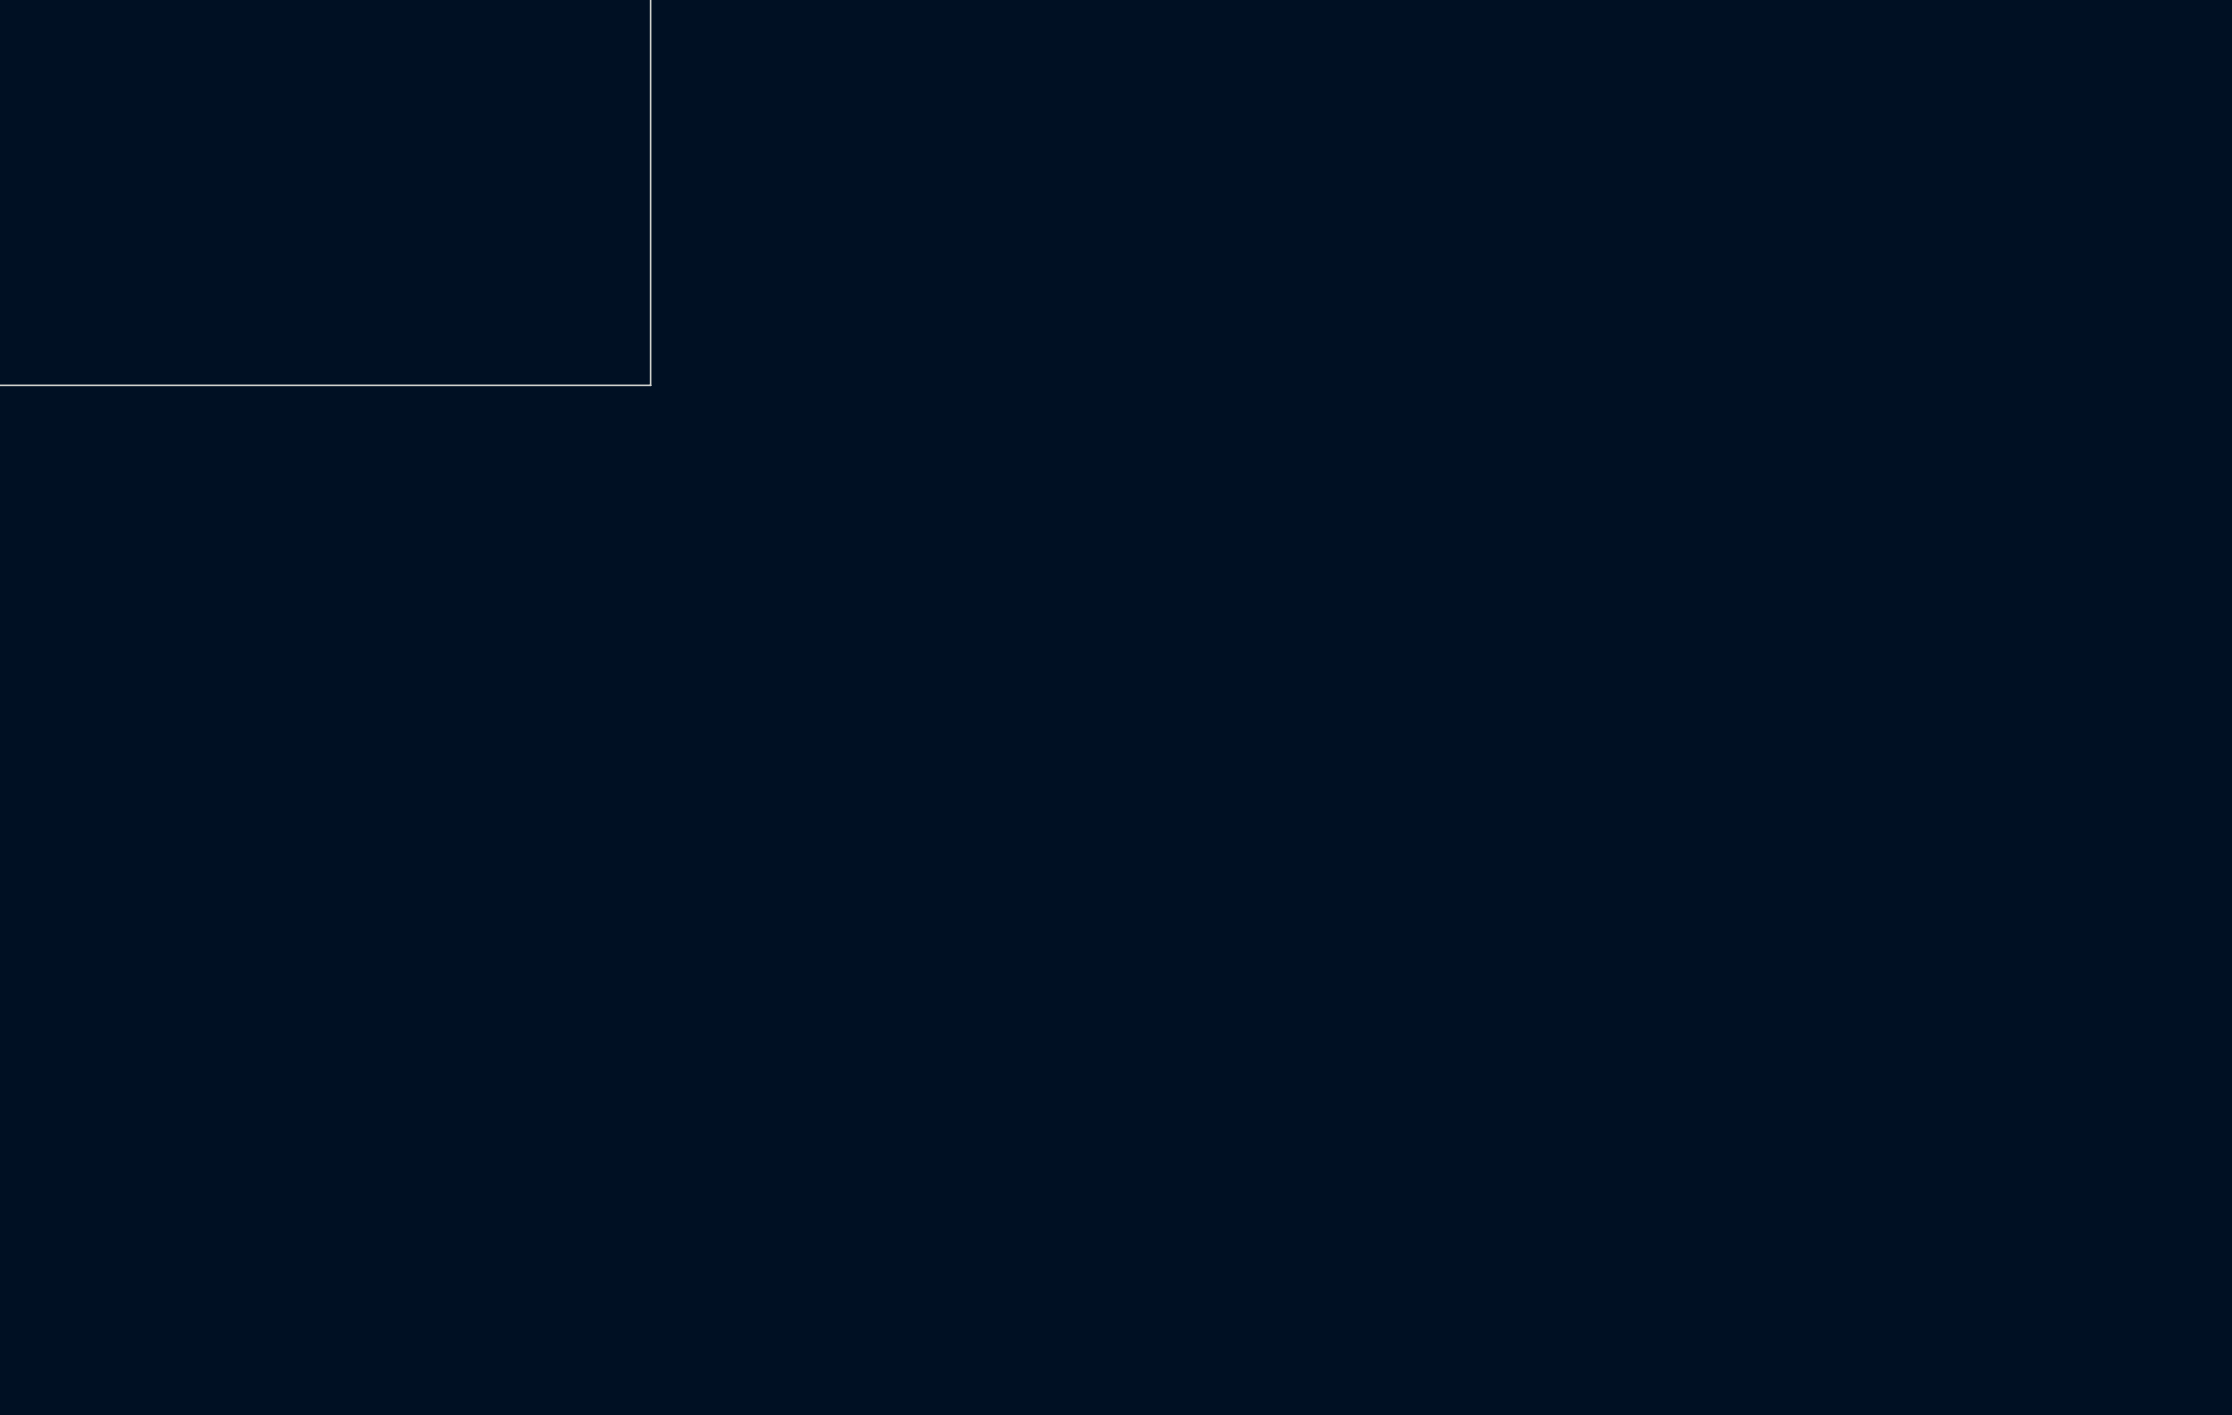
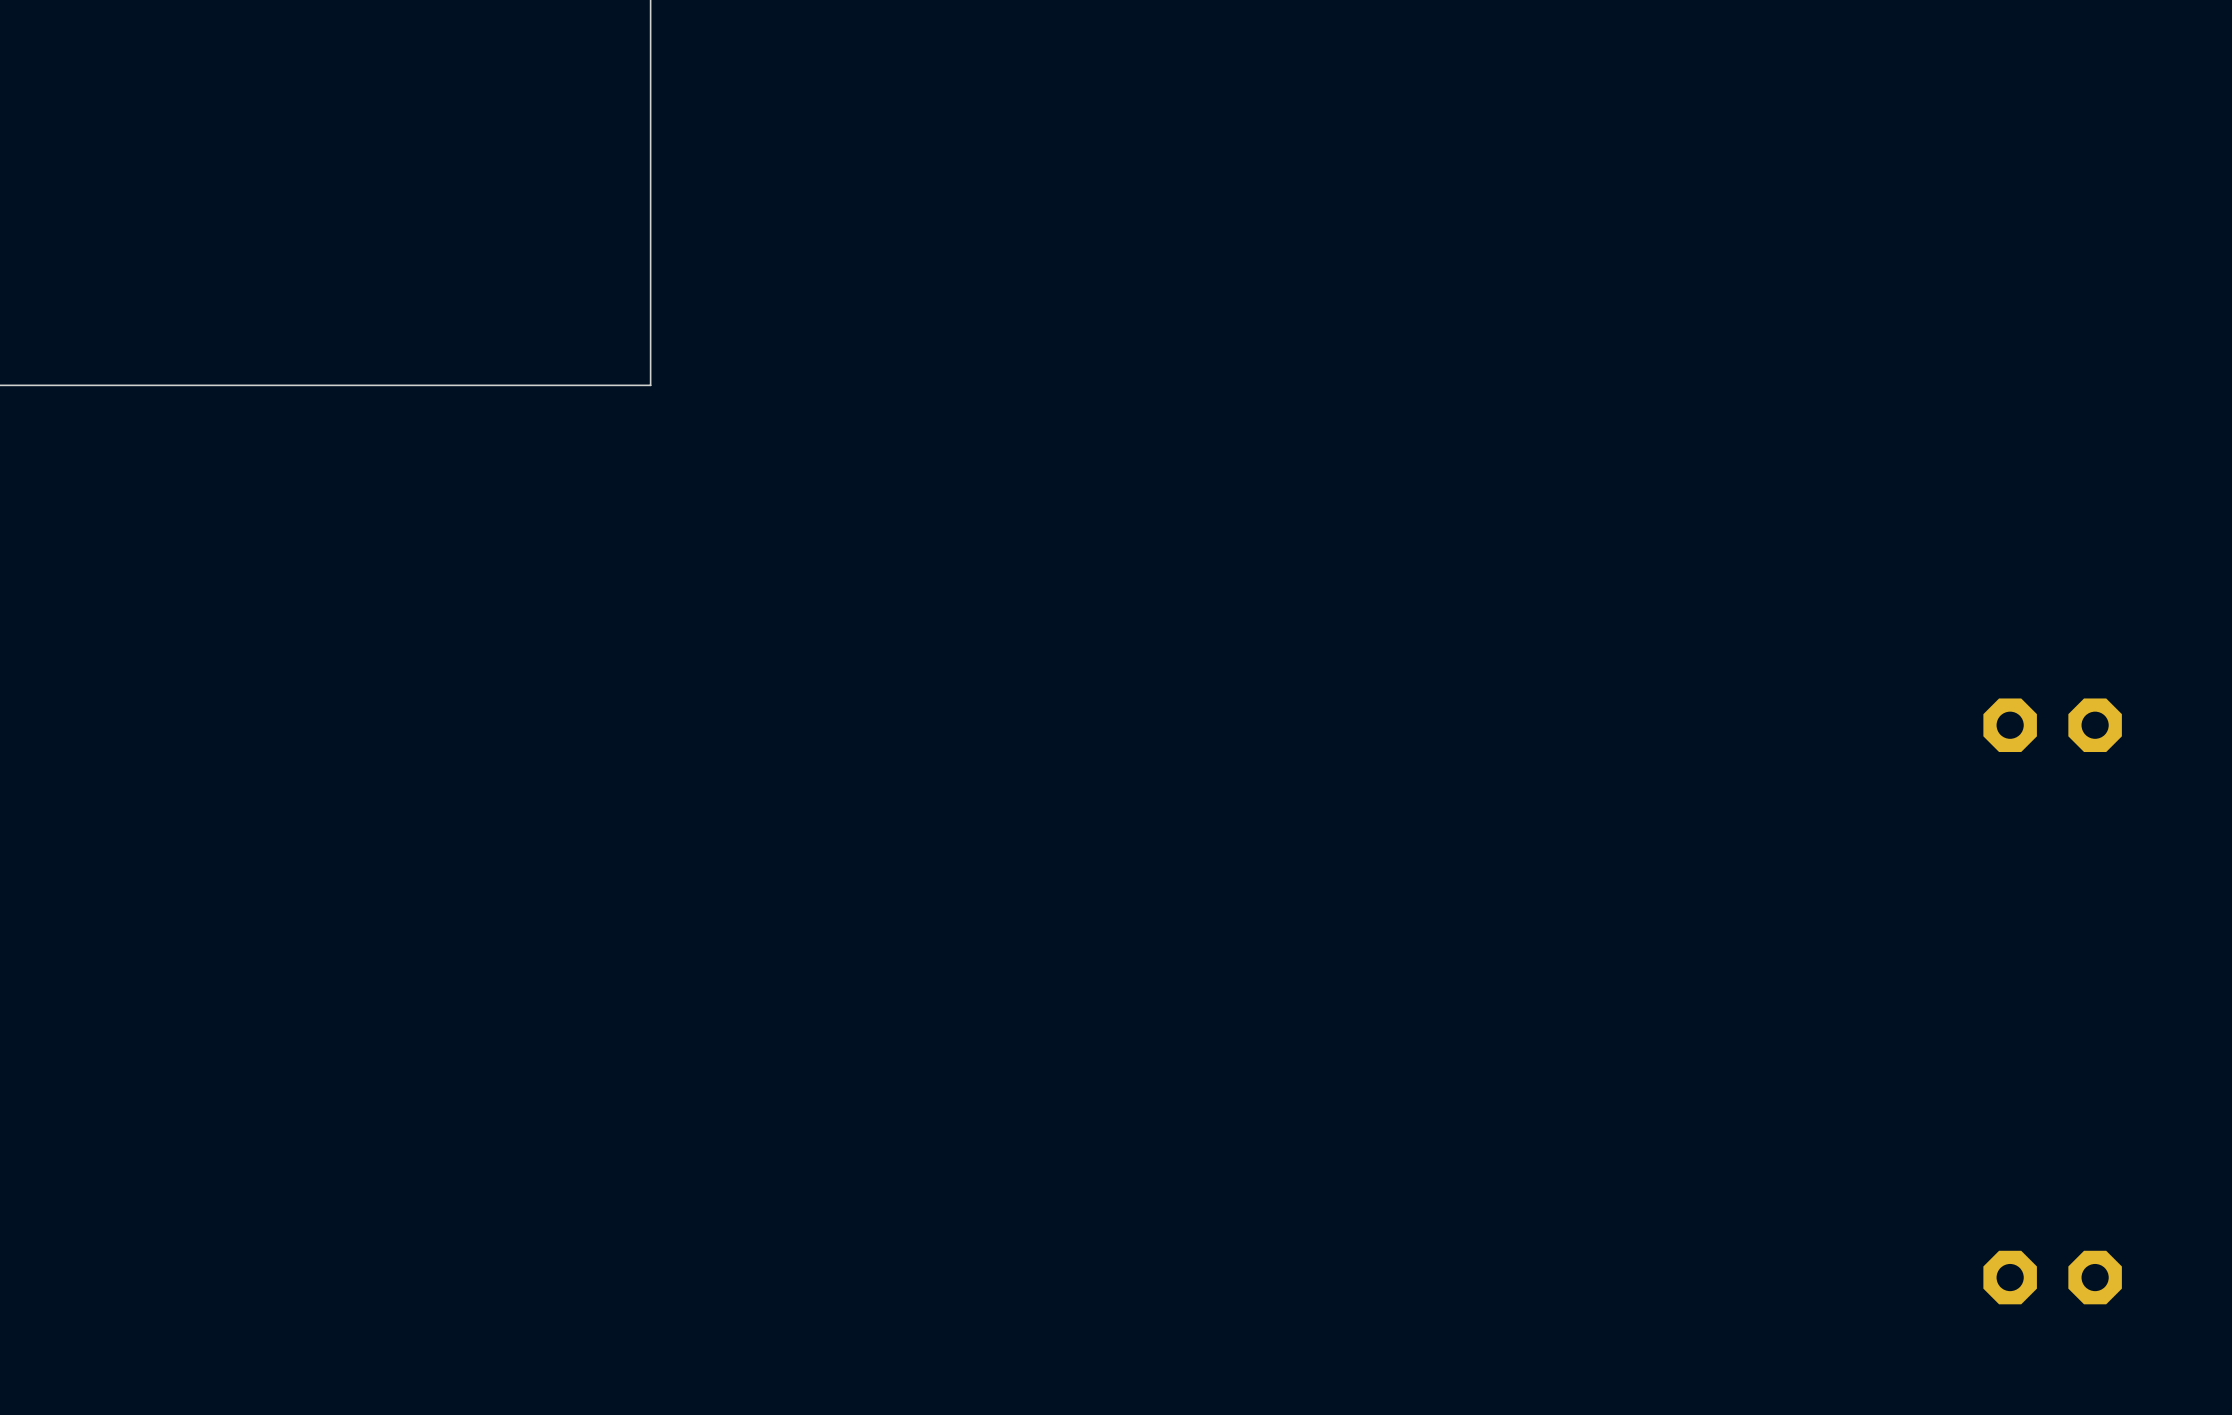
part: none -> (2052, 725)
part: none -> (2052, 1277)

